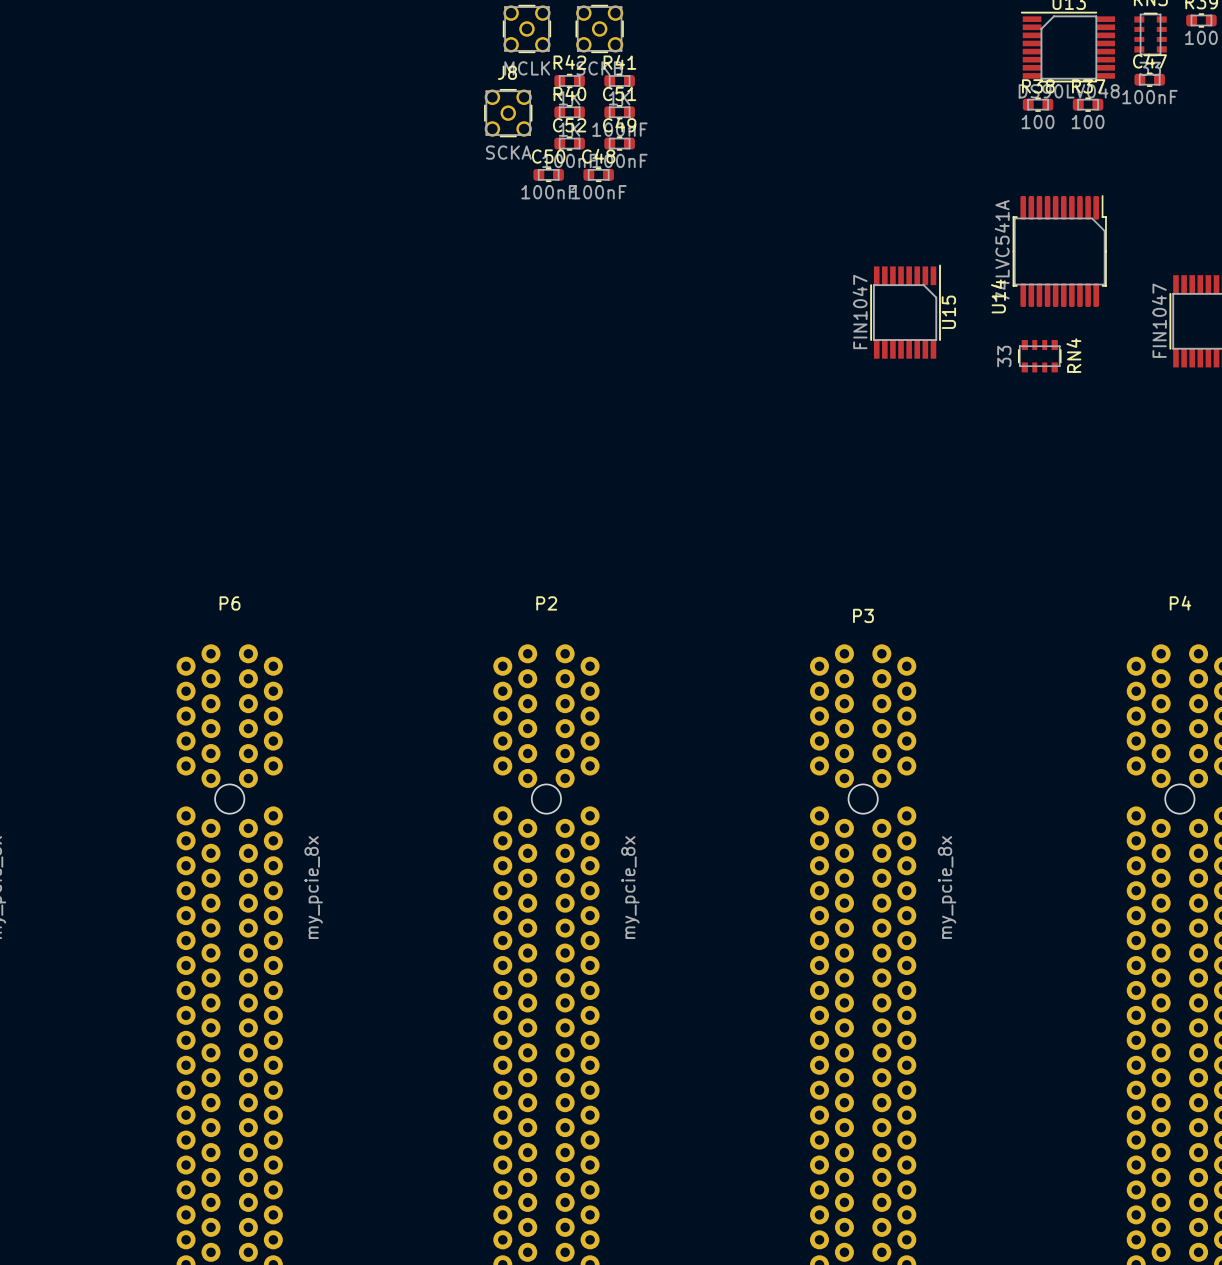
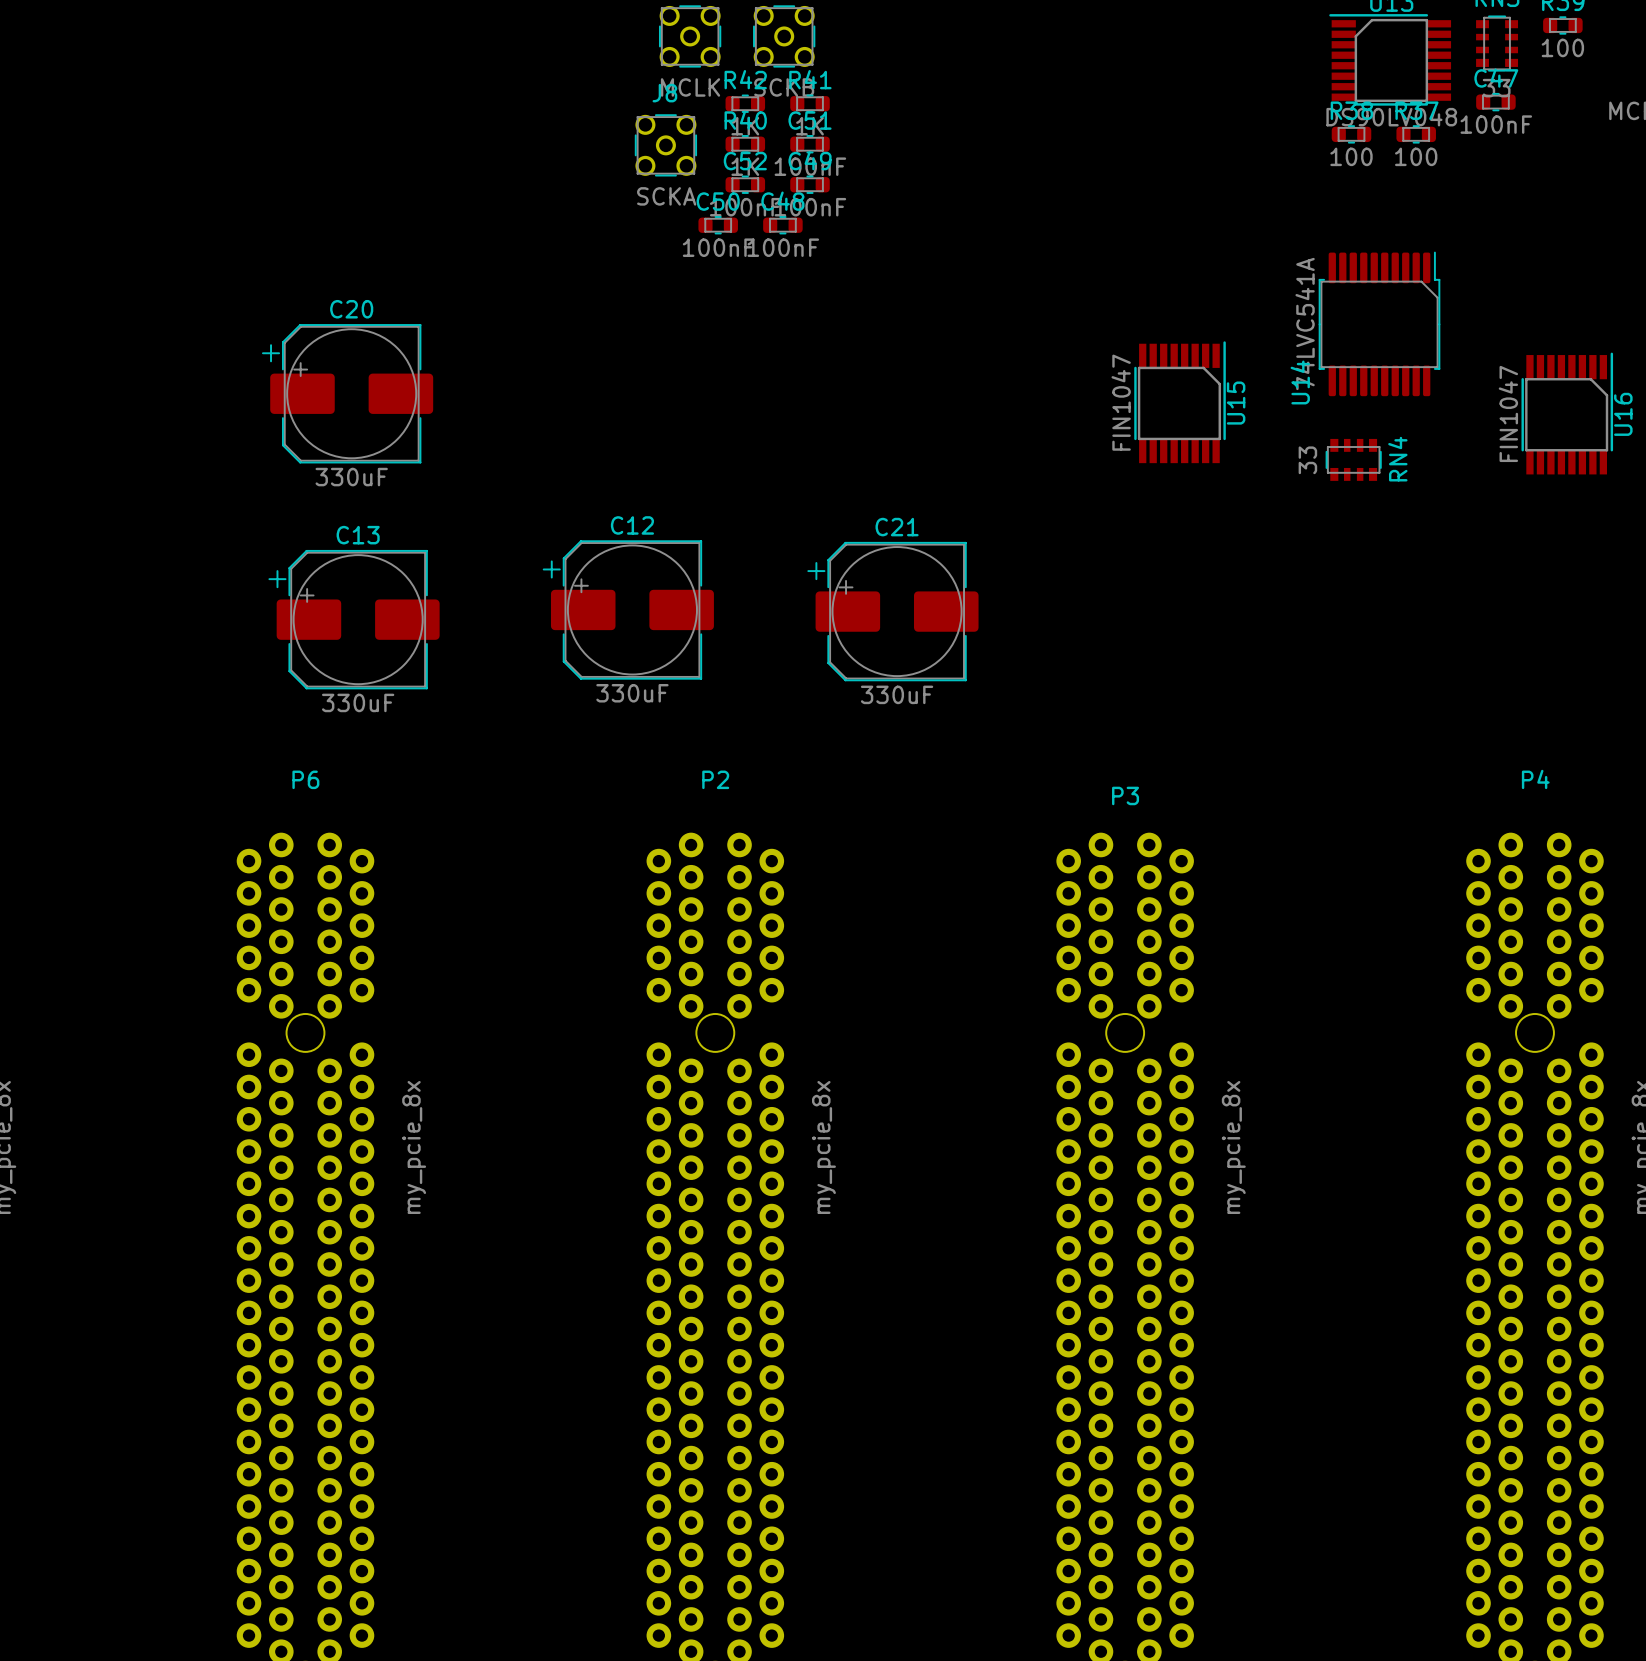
C20: none -> 330uF (347, 393)
C12: none -> 330uF (628, 609)
C21: none -> 330uF (892, 611)
C13: none -> 330uF (354, 619)

